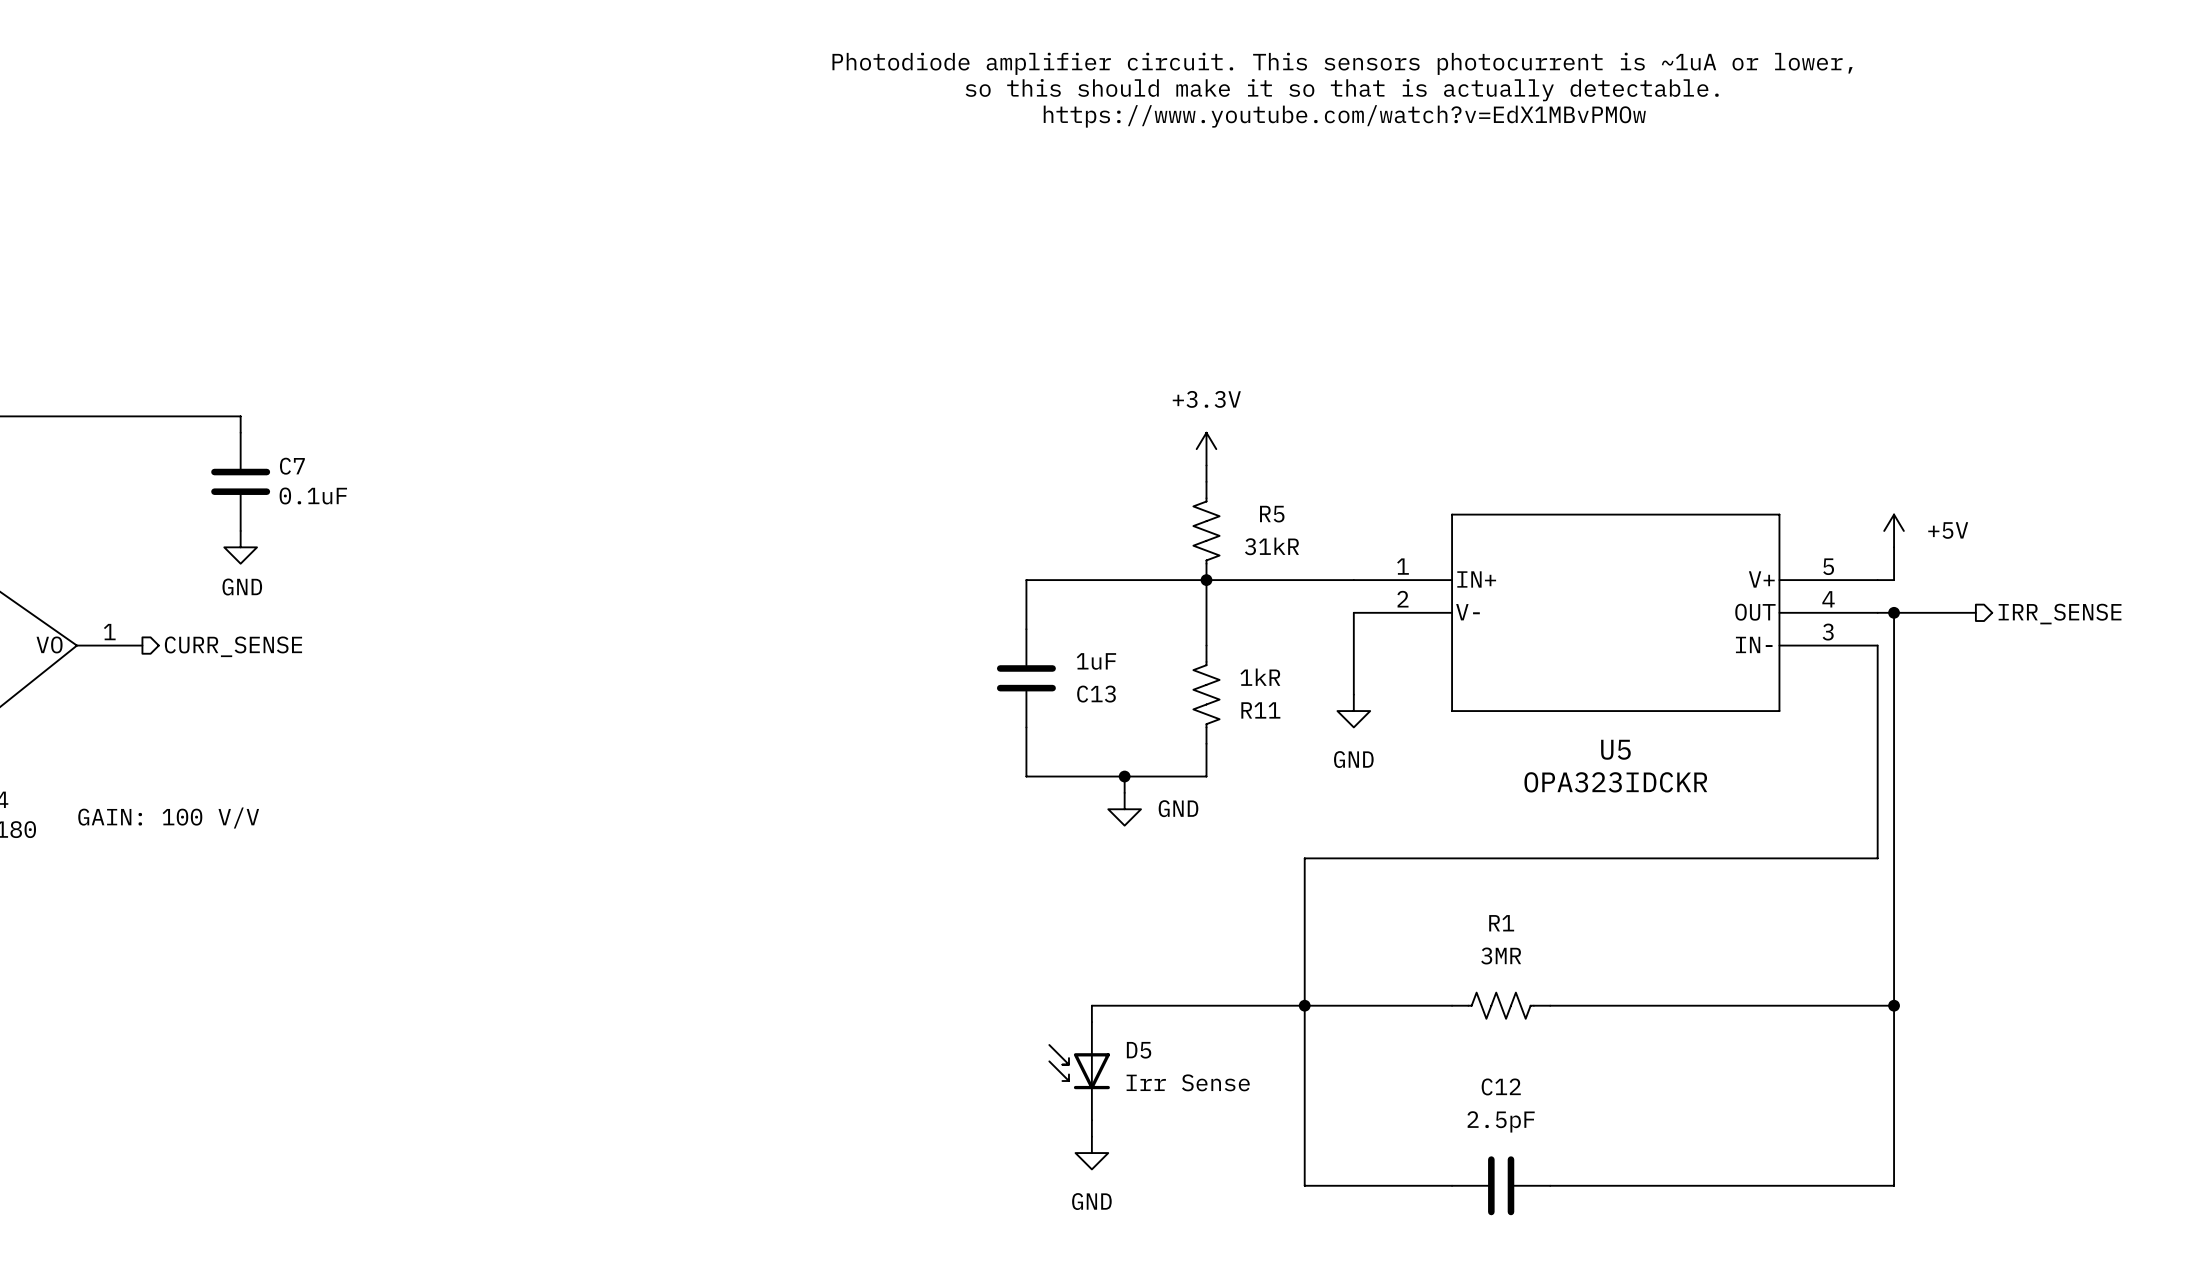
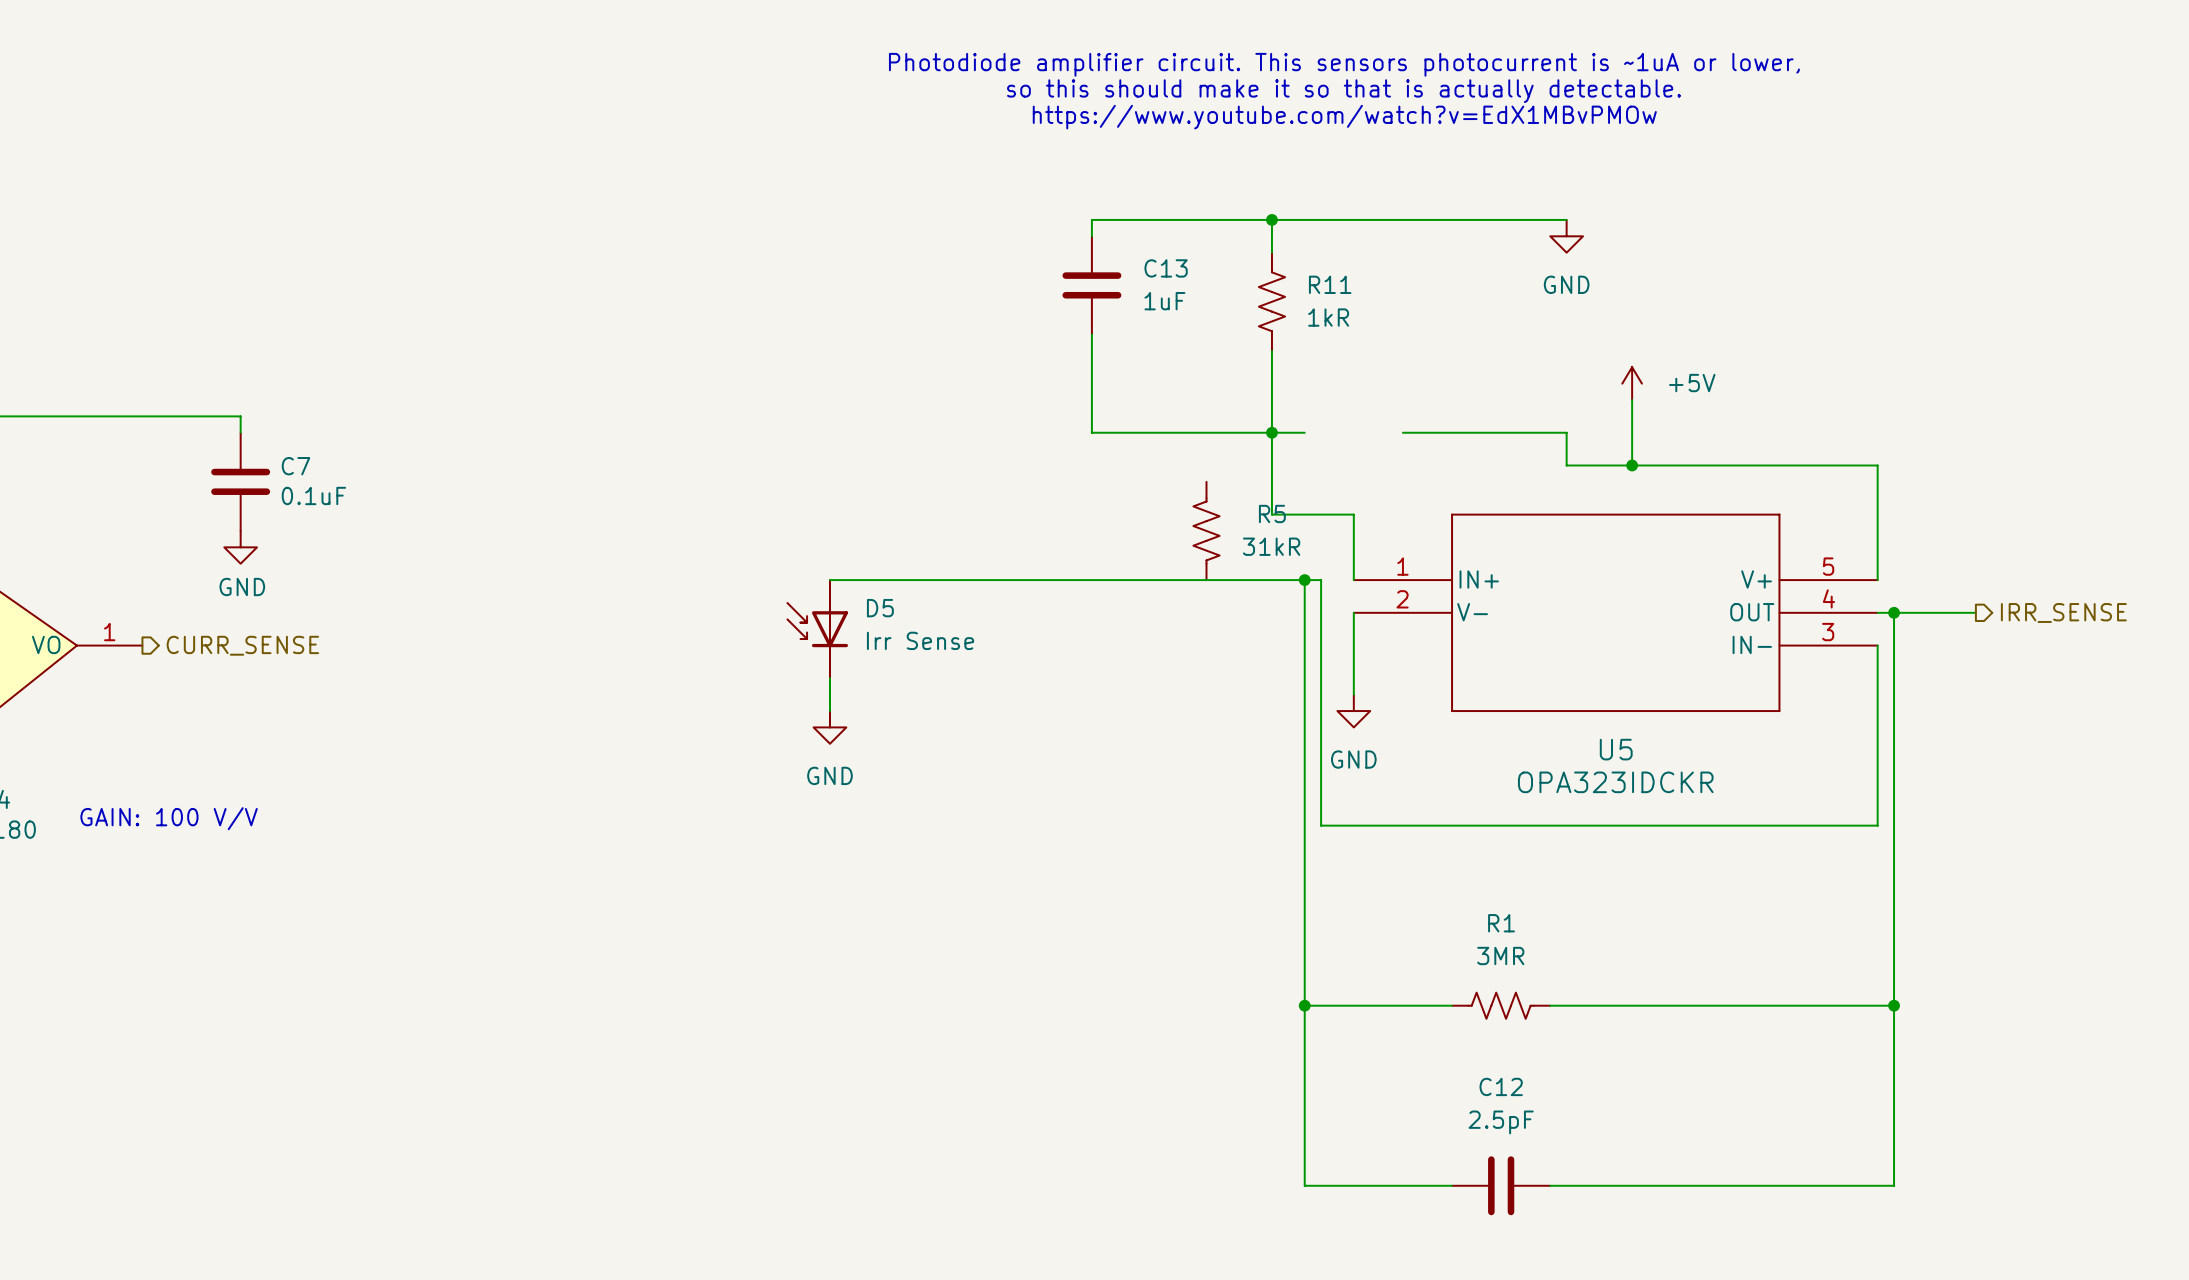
wire: none -> (1271, 219) (1271, 252)
junction: none -> (1271, 219)
wire: none -> (1566, 219) (1091, 219) (1091, 236)
power symbol: none -> GND (1566, 236)
wire: none -> (1091, 334) (1091, 432) (1304, 432)
wire: none -> (1632, 400) (1632, 465)
junction: none -> (1271, 432)
power symbol: +3.3V (1206, 449) -> none
wire: (1206, 465) (1206, 481) -> none
junction: none -> (1632, 465)
power symbol position: +5V (1894, 530) -> +5V (1632, 383)
wire: (1894, 547) (1894, 580) (1877, 580) -> (1402, 432) (1566, 432) (1566, 465) (1877, 465) (1877, 580)
wire: (1026, 580) (1026, 629) -> (1026, 580) (829, 580)
wire: (1206, 580) (1206, 645) -> none
junction: (1206, 580) -> none
wire: none -> (1304, 580) (1304, 858)
junction: none -> (1304, 580)
wire: (1321, 580) (1353, 580) -> (1271, 350) (1271, 514) (1353, 514) (1353, 580)
C13 value position: 1uF (1096, 661) -> 1uF (1164, 301)
R11 value position: 1kR (1260, 677) -> 1kR (1328, 317)
wire: none -> (829, 678) (829, 711)
C13 position: (1026, 678) -> (1091, 285)
C13 name position: C13 (1096, 694) -> C13 (1166, 268)
R11 flip: as is (1206, 694) -> left-right (1271, 301)
R11 position: (1206, 694) -> (1271, 301)
R11 name position: R11 (1260, 710) -> R11 (1330, 284)
power symbol: none -> GND (829, 727)
wire: (1026, 727) (1026, 776) (1206, 776) (1206, 743) -> none
wire: (1124, 776) (1124, 792) -> none
junction: (1124, 776) -> none
power symbol: GND (1124, 809) -> none
wire: (1877, 825) (1877, 858) (1304, 858) -> (1877, 825) (1321, 825) (1321, 580)
wire: (1304, 1005) (1091, 1005) (1091, 1022) -> none
D5 position: (1079, 1071) -> (817, 629)
wire: (1091, 1120) (1091, 1136) -> none
power symbol: GND (1091, 1153) -> none

